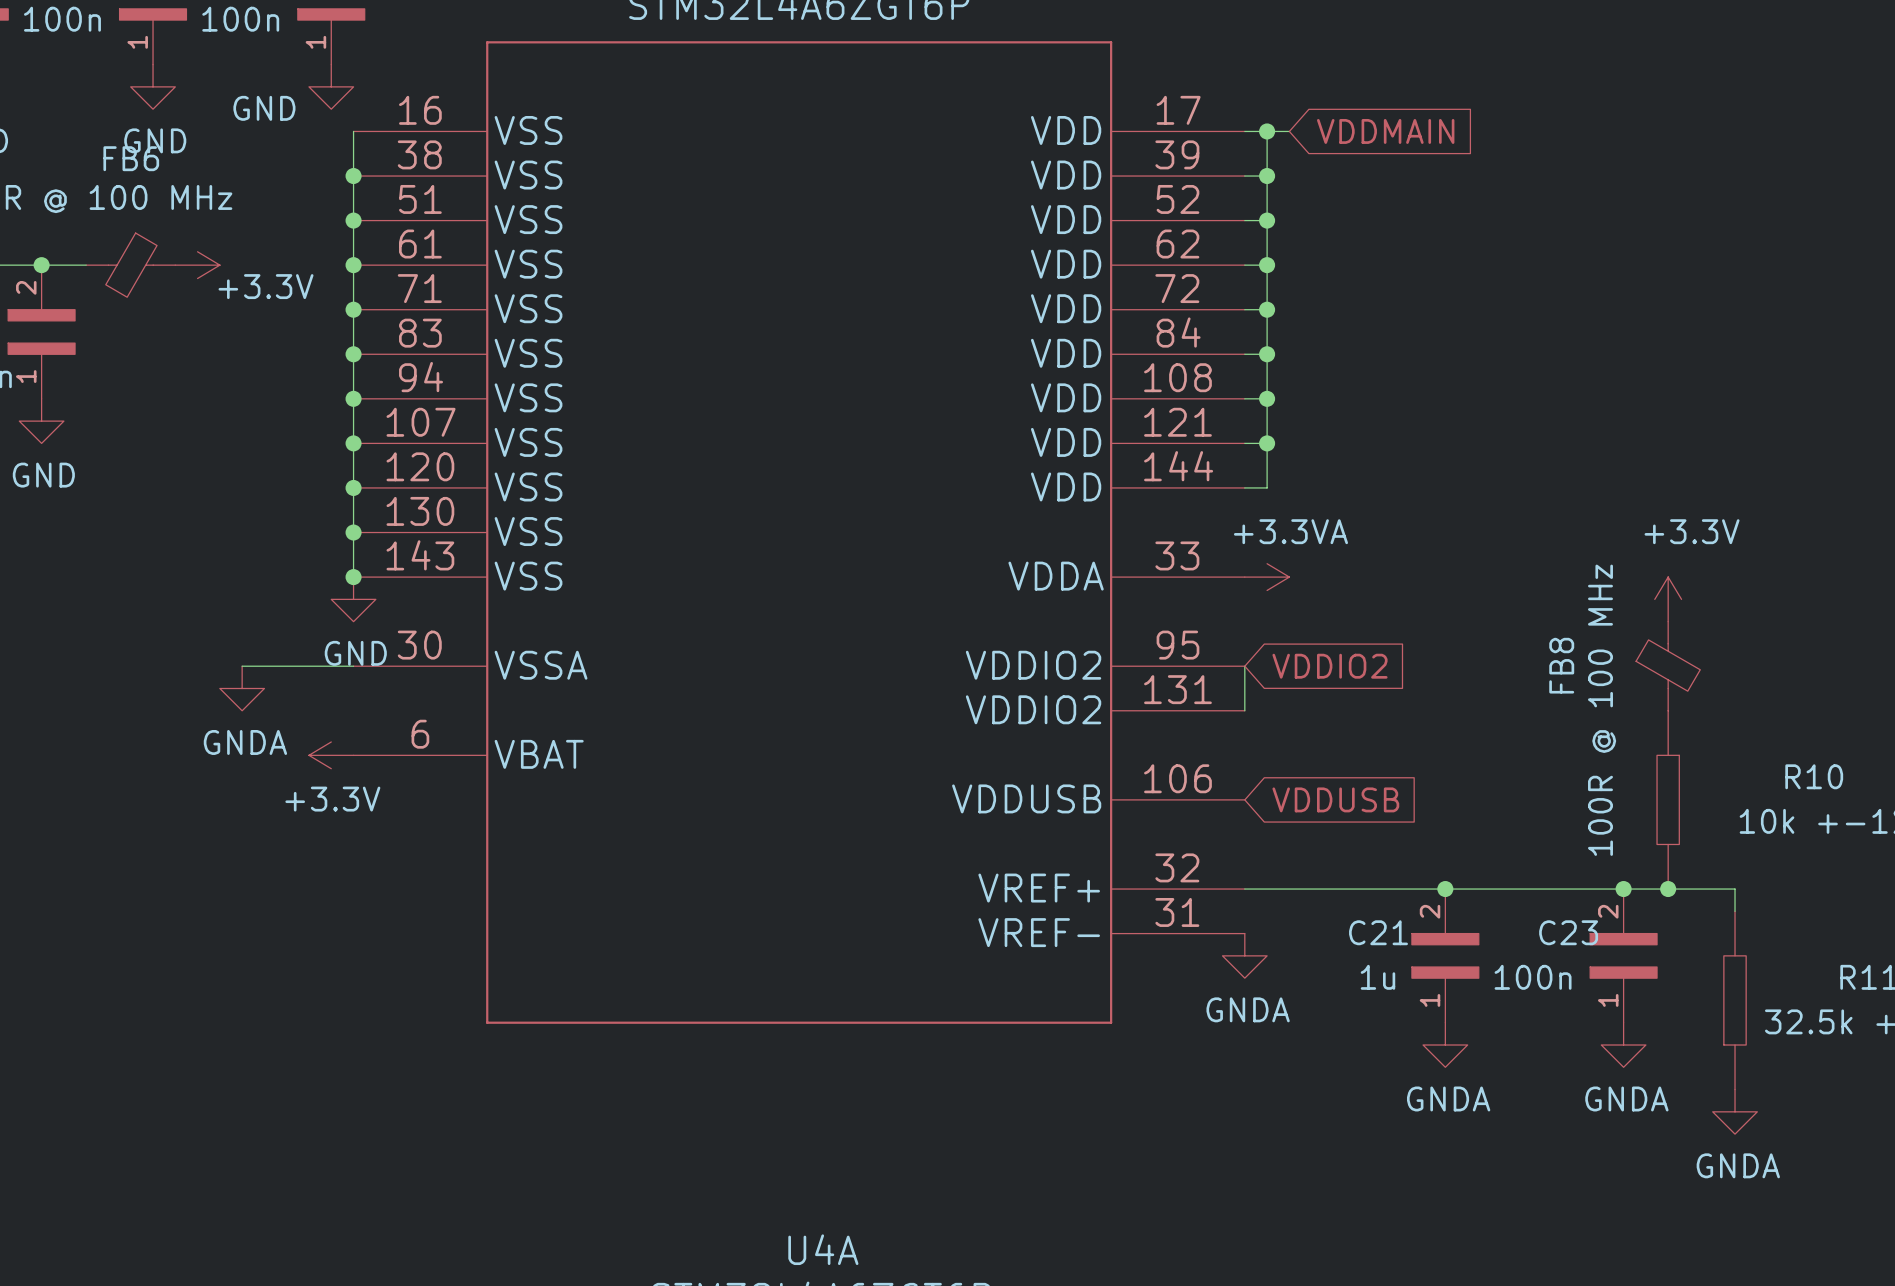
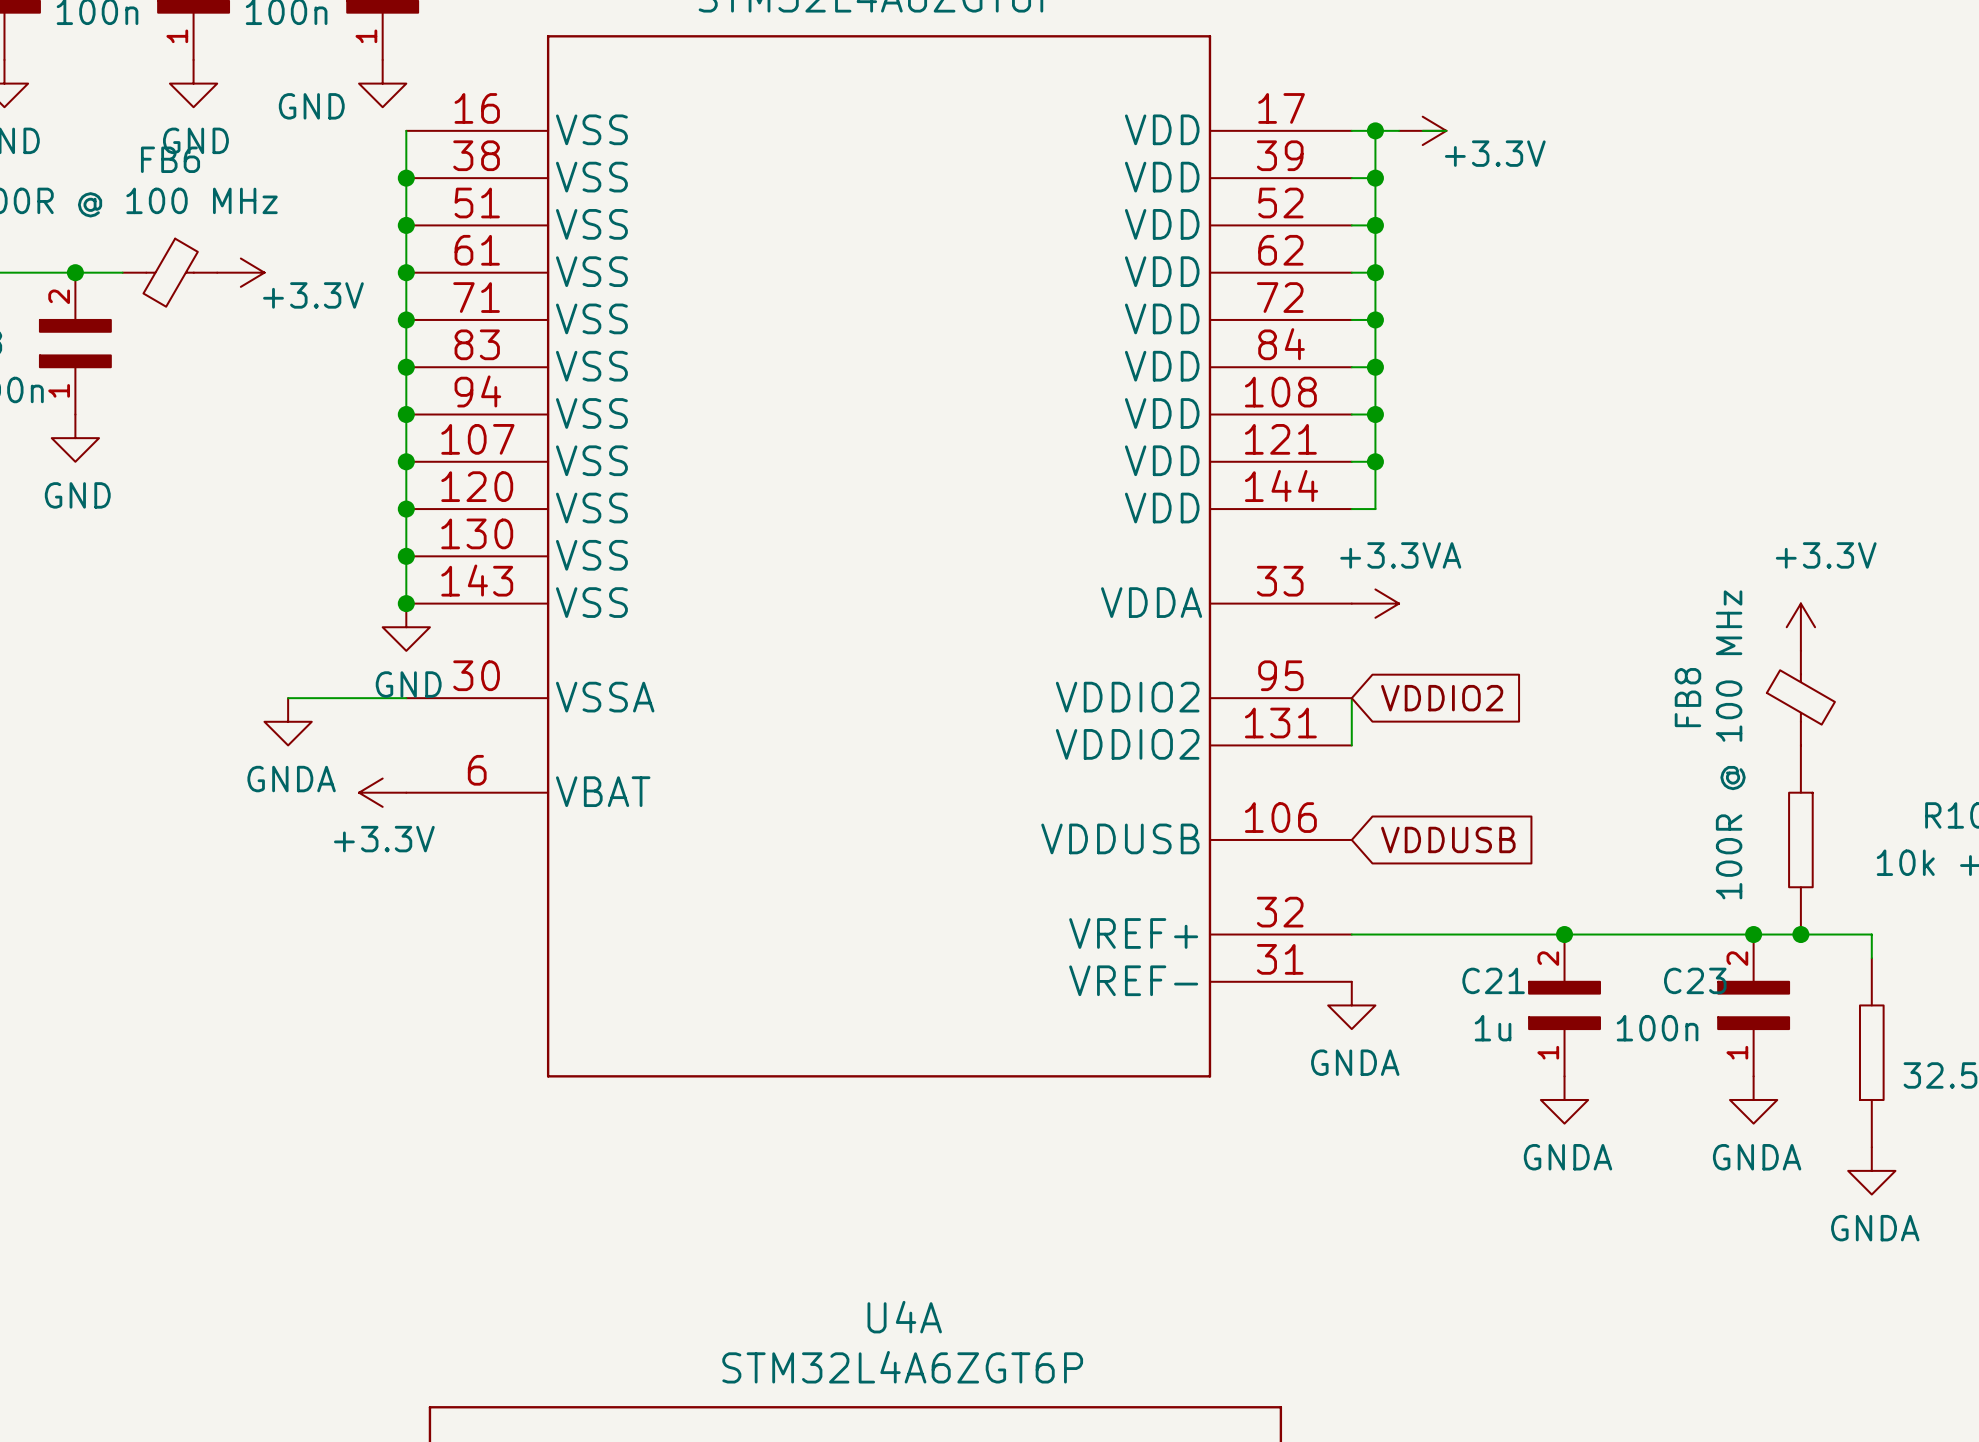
wire: none -> (1422, 130) (1446, 130)
power symbol: none -> +3.3V (1422, 130)
global label: VDDMAIN (1385, 131) -> none

